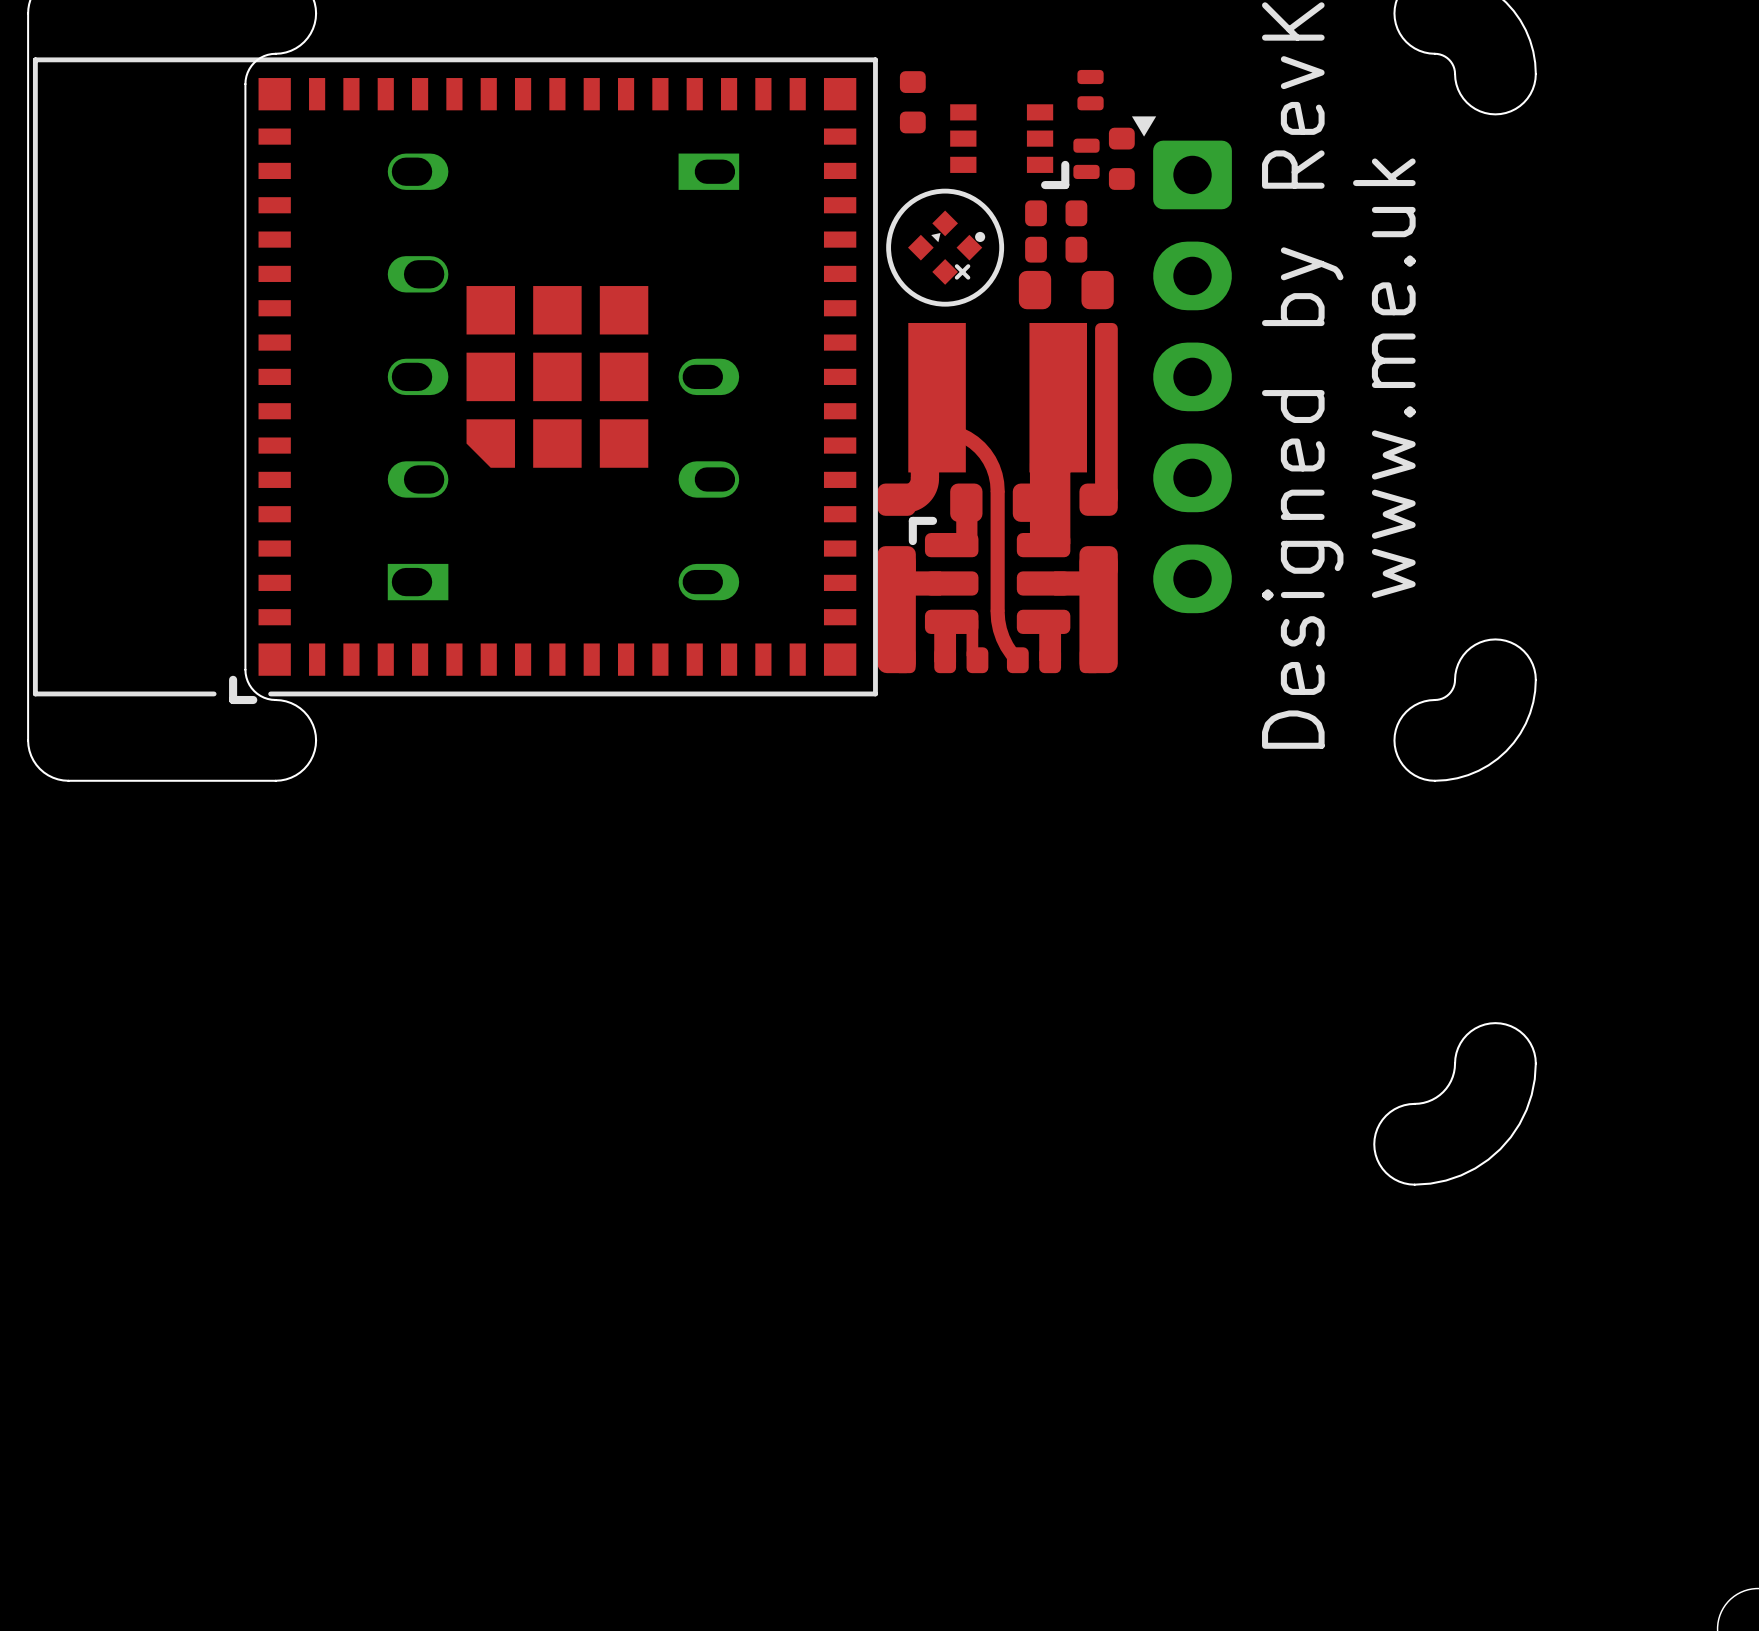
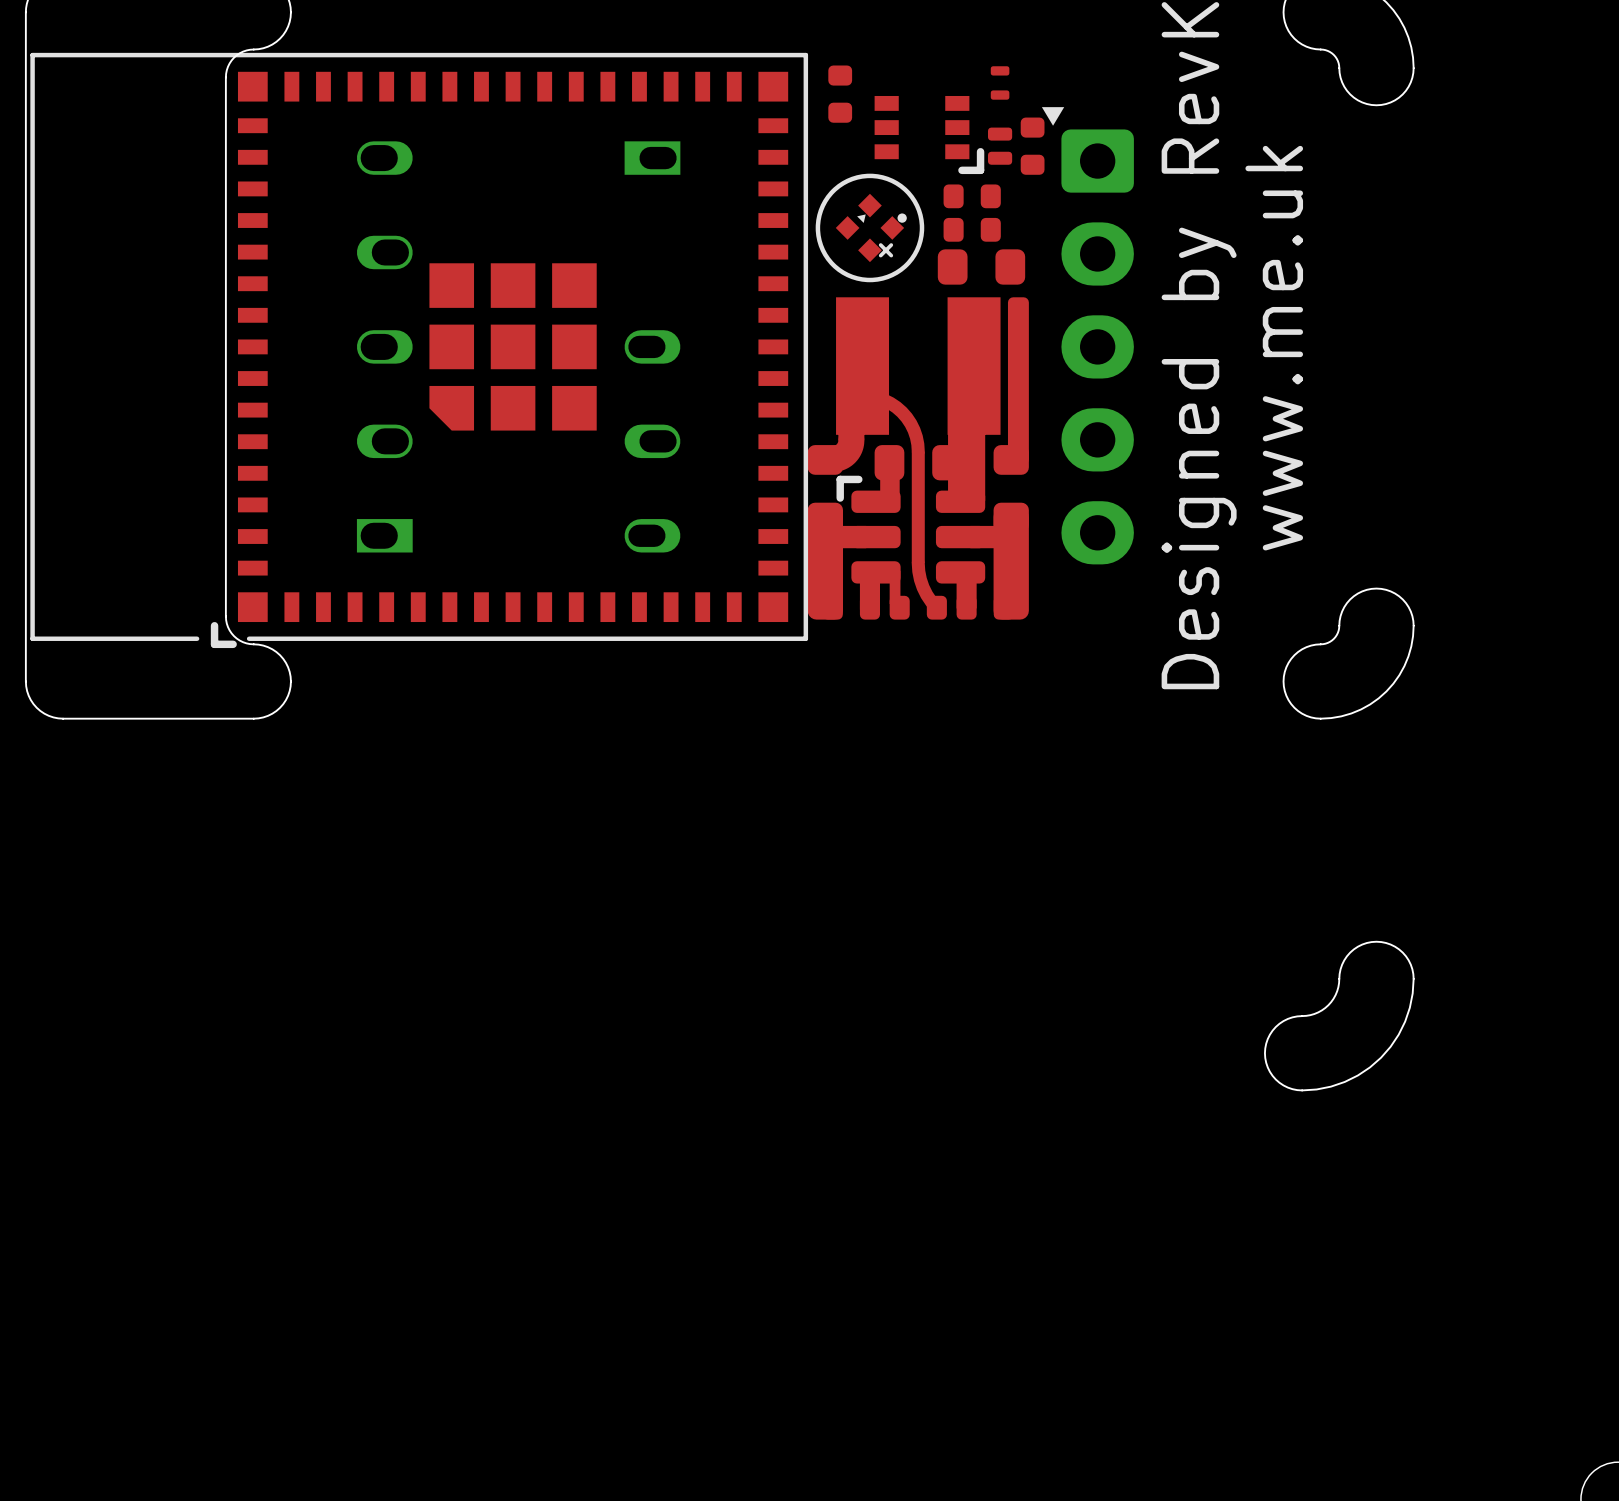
part footprint: [1077, 69, 1104, 111] -> [990, 66, 1010, 100]

